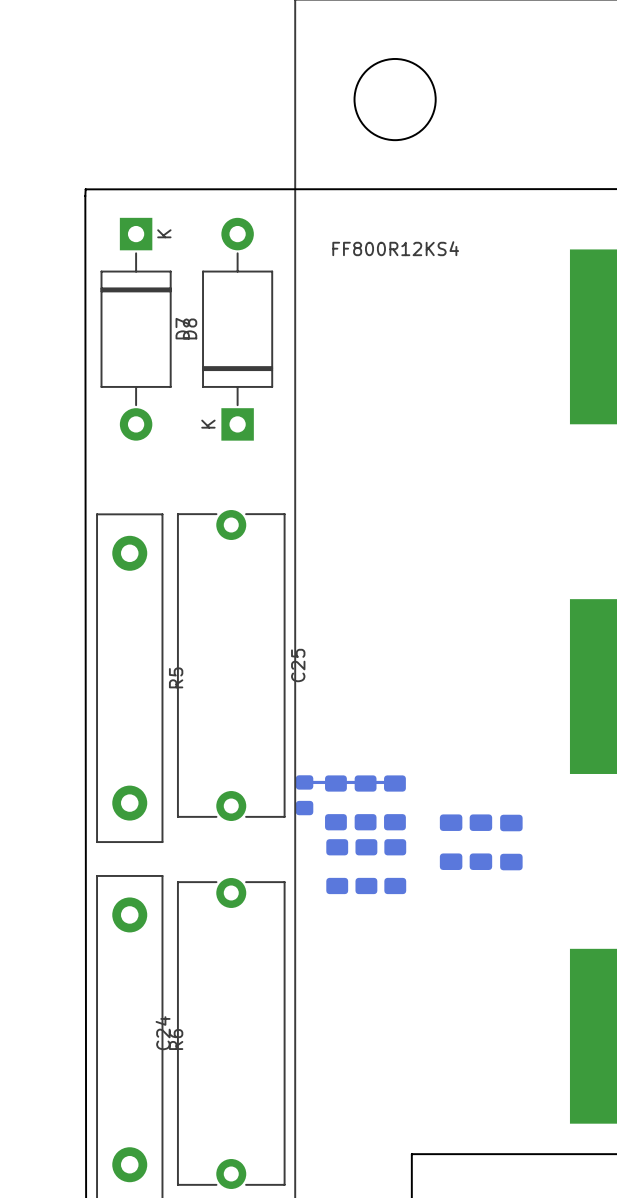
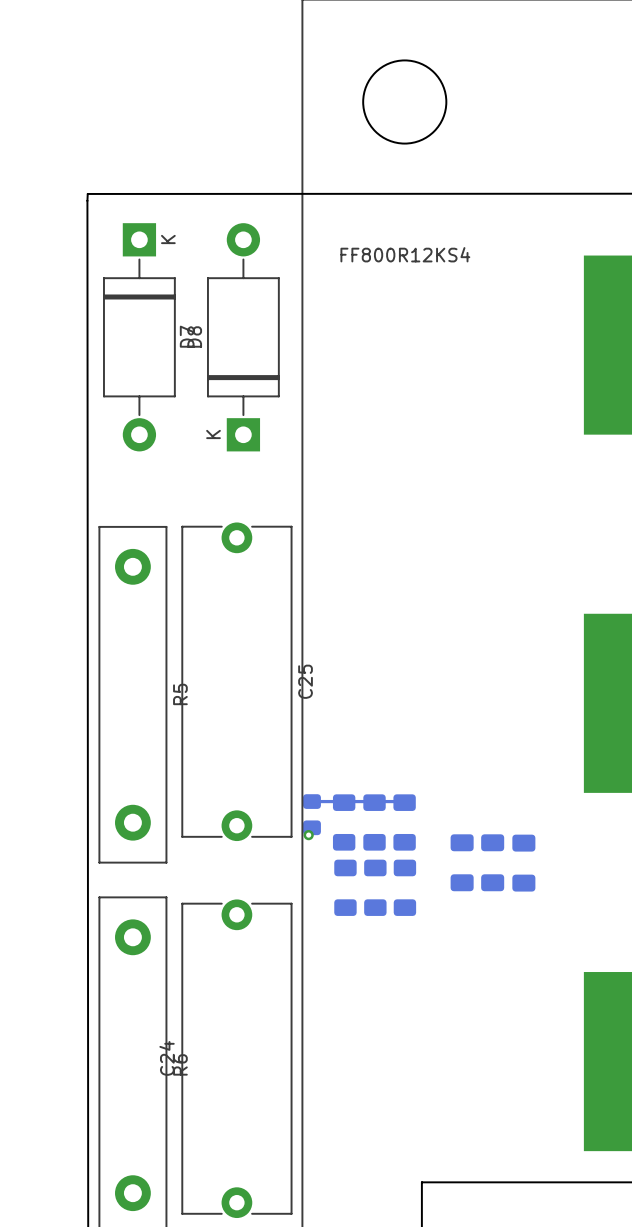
via: none -> (308, 835)

